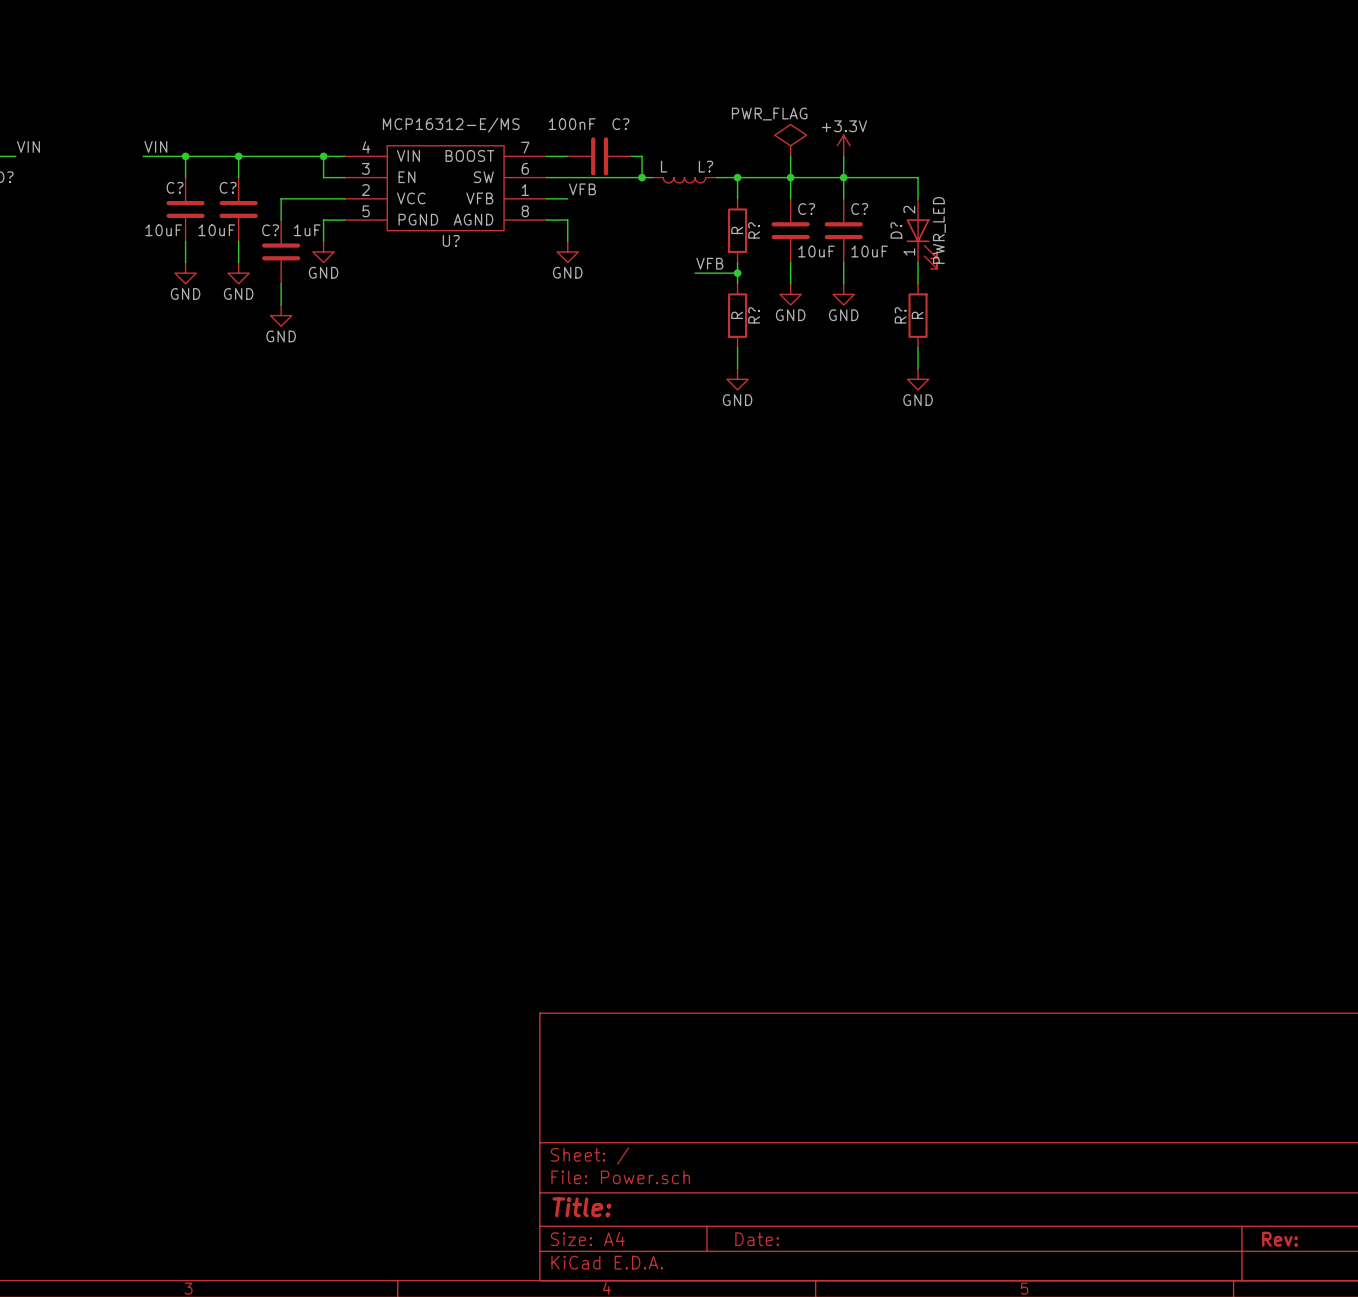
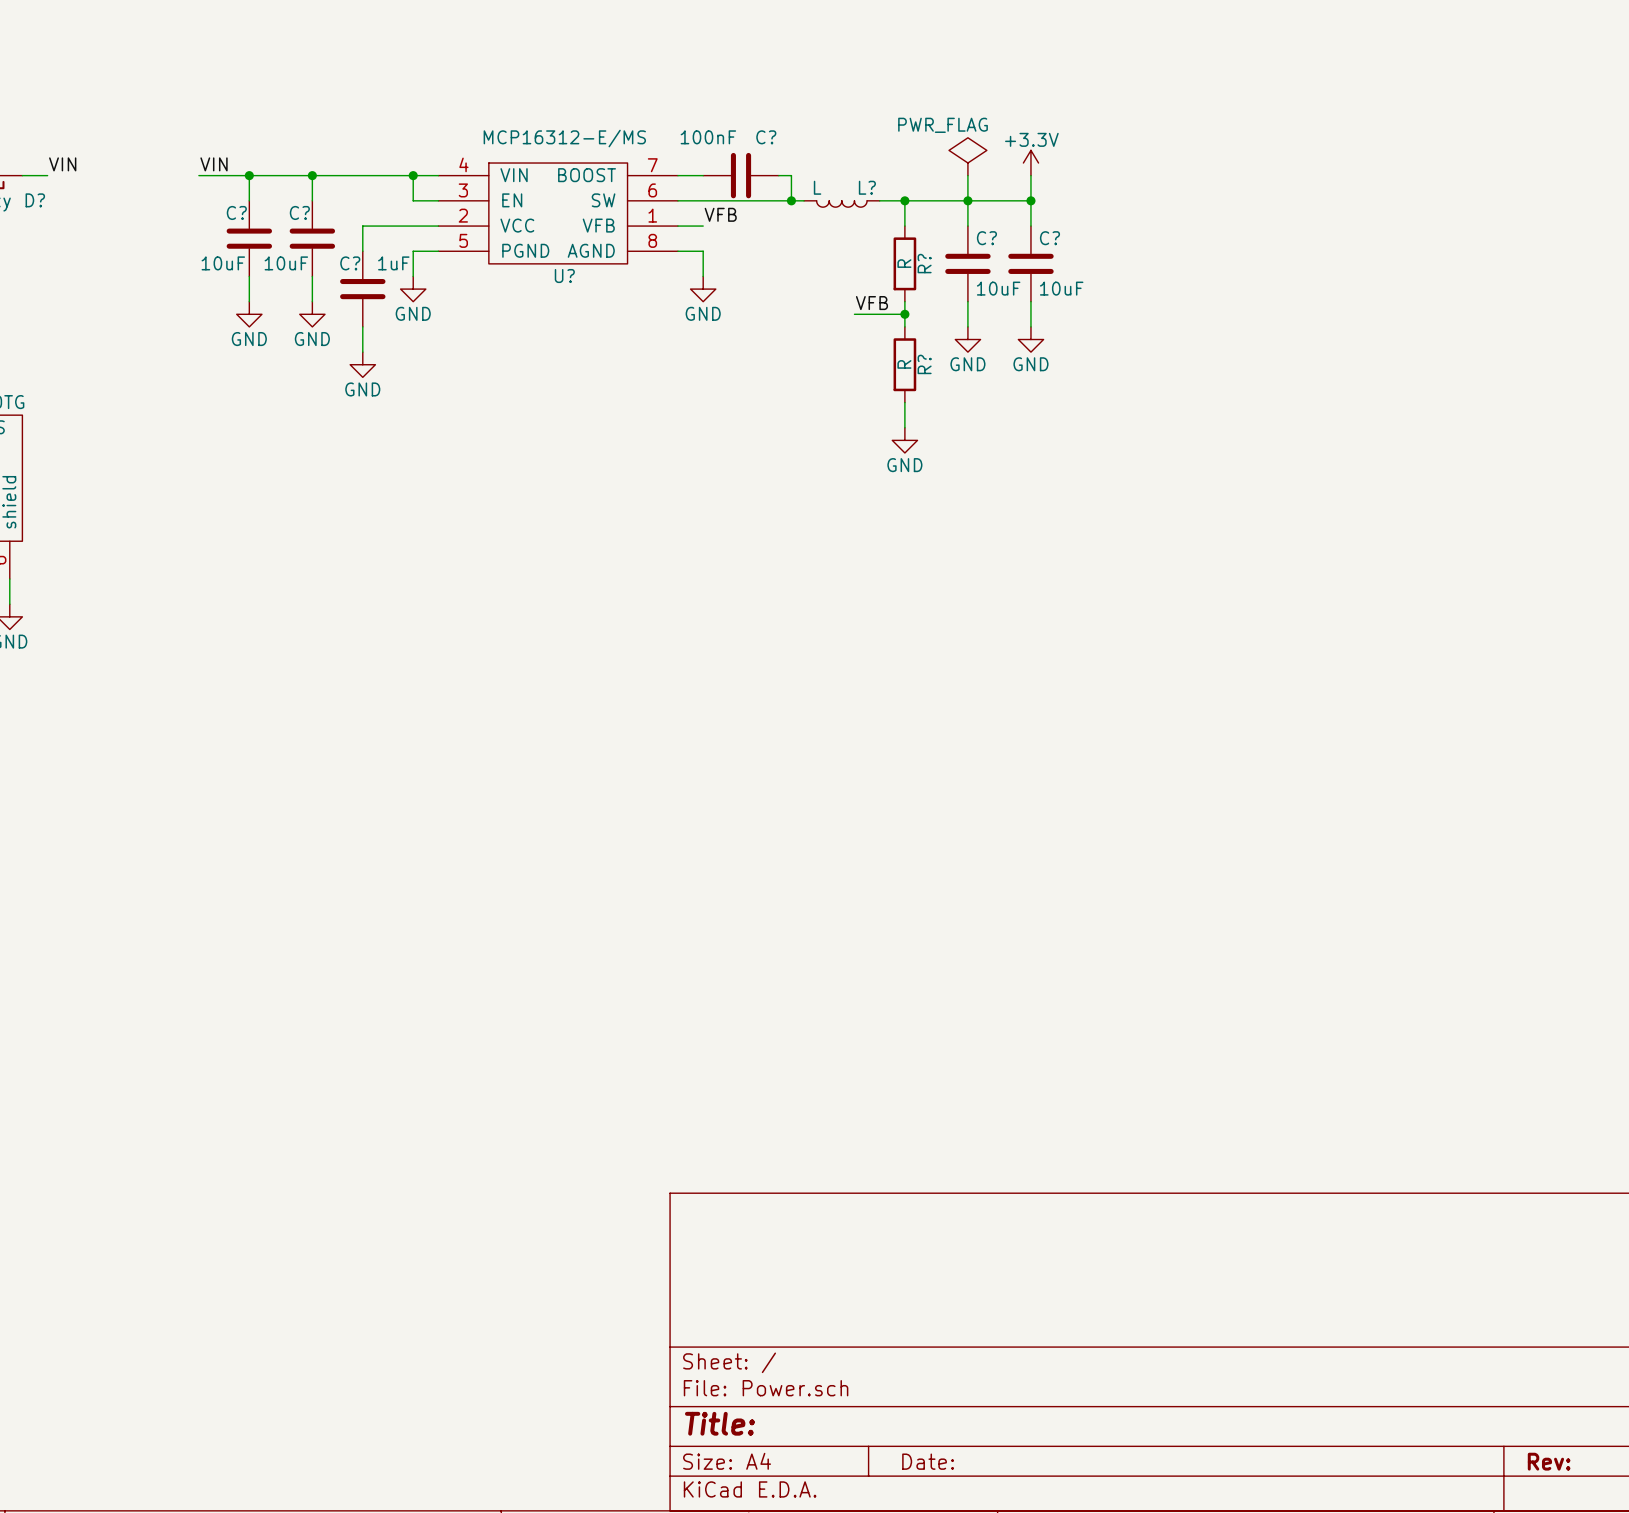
wire: (843, 177) (918, 177) (918, 198) -> none
D?: PWR_LED (921, 233) -> none
wire: (918, 262) (918, 283) -> none
R?: R (918, 315) -> none
wire: (918, 347) (918, 368) -> none
power symbol: GND (918, 379) -> none

